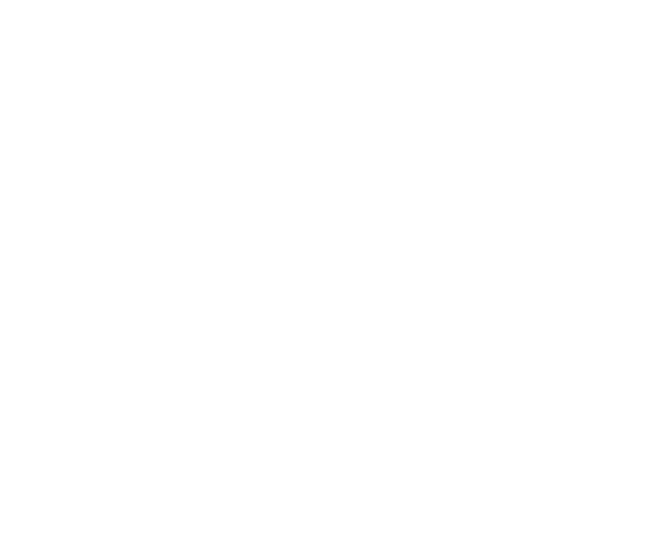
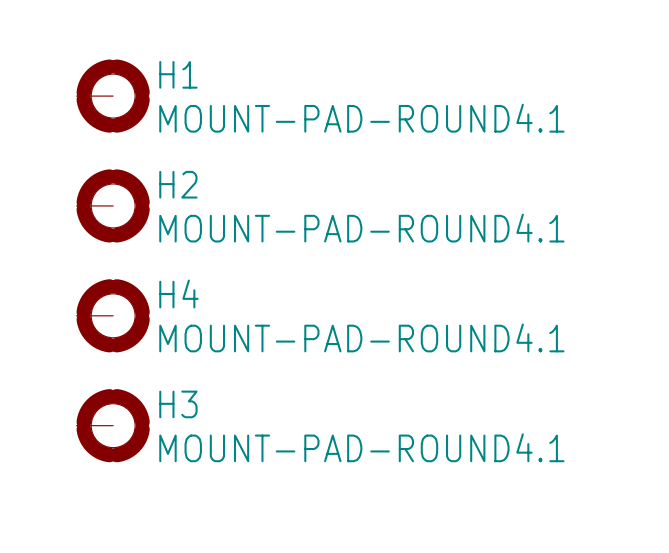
H1: none -> MOUNT-PAD-ROUND4.1 (113, 96)
H2: none -> MOUNT-PAD-ROUND4.1 (113, 205)
H4: none -> MOUNT-PAD-ROUND4.1 (113, 315)
H3: none -> MOUNT-PAD-ROUND4.1 (113, 425)

